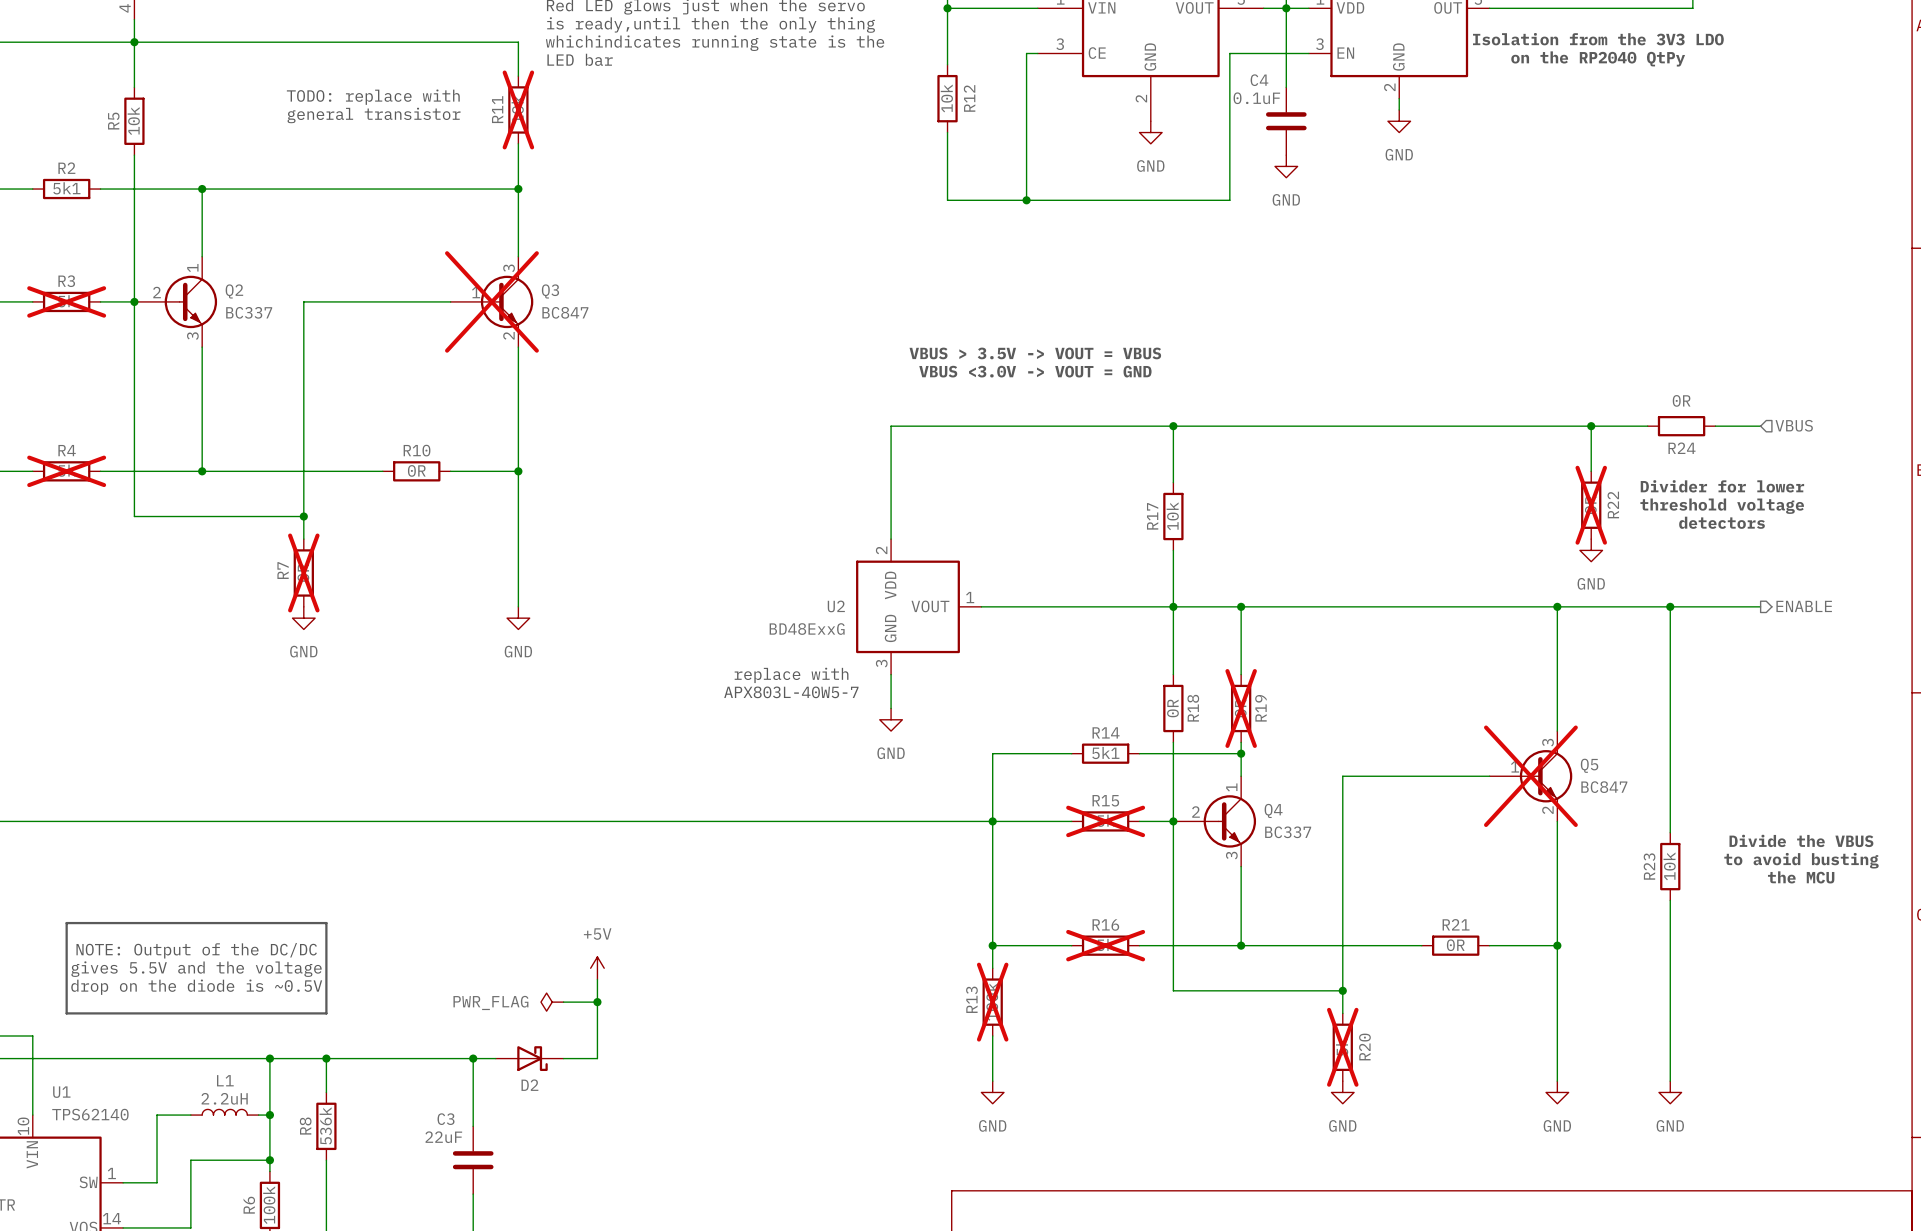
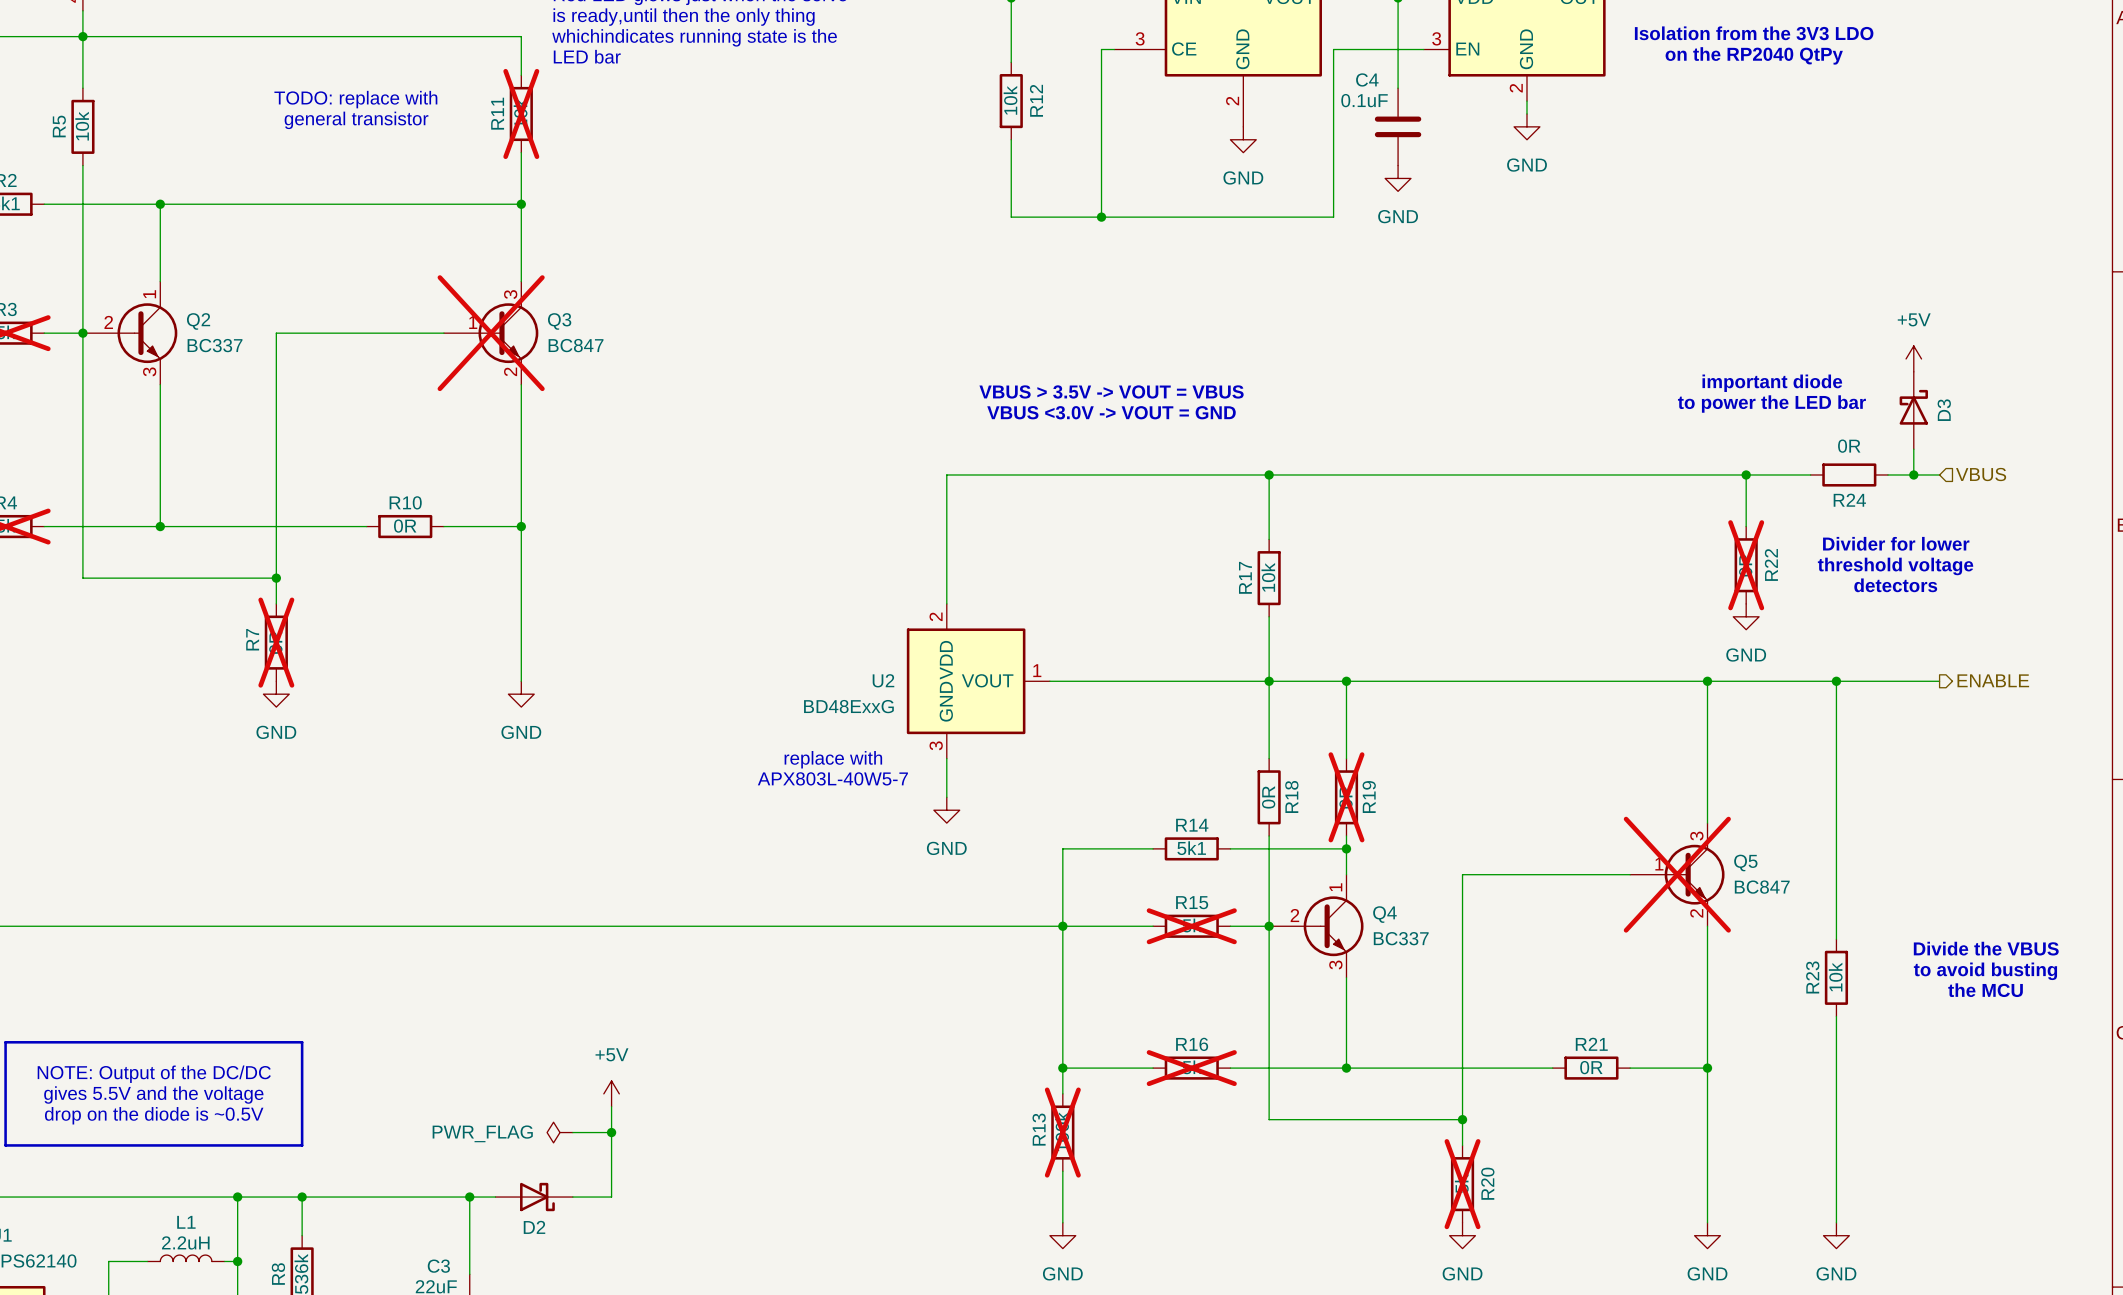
power symbol: none -> +5V (1913, 358)
text: none -> important diode (1772, 383)
text: none -> to power the LED bar (1771, 404)
D3: none -> (1913, 410)
wire: none -> (1913, 449) (1913, 474)
junction: none -> (1913, 474)

